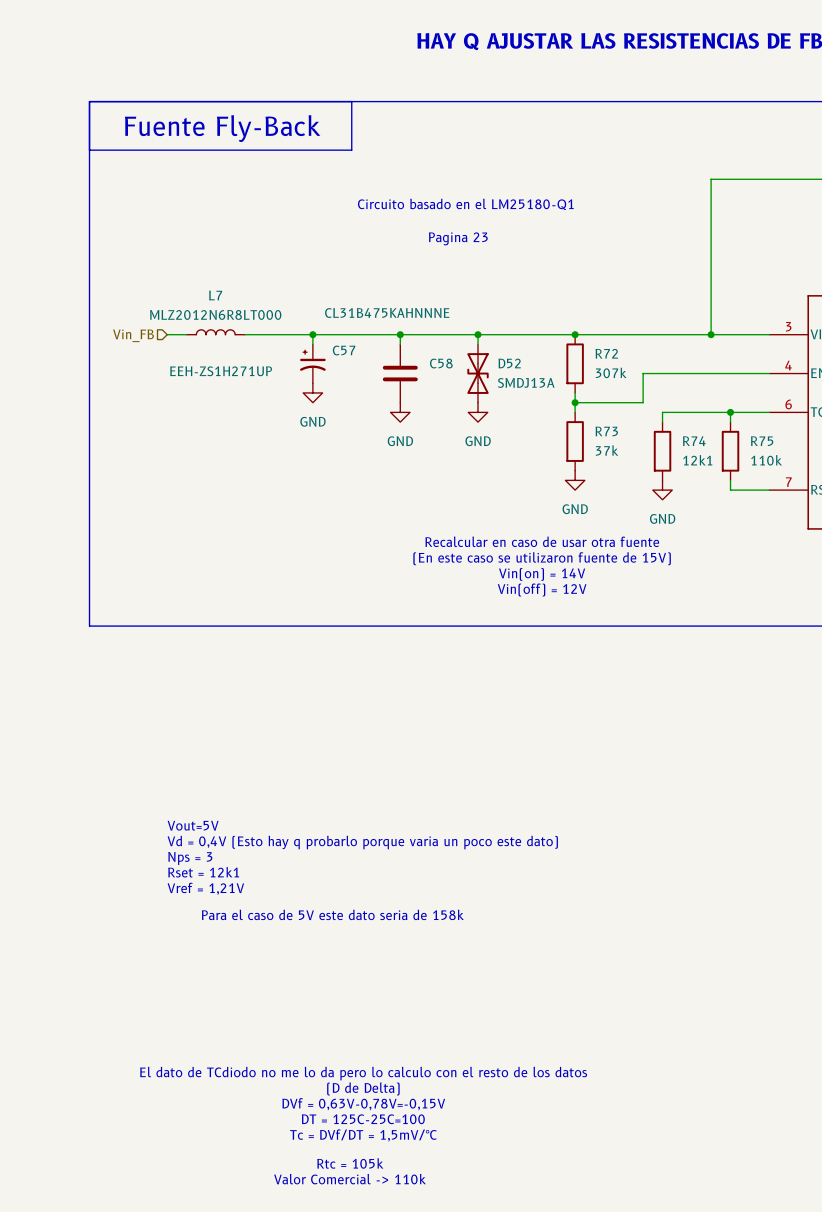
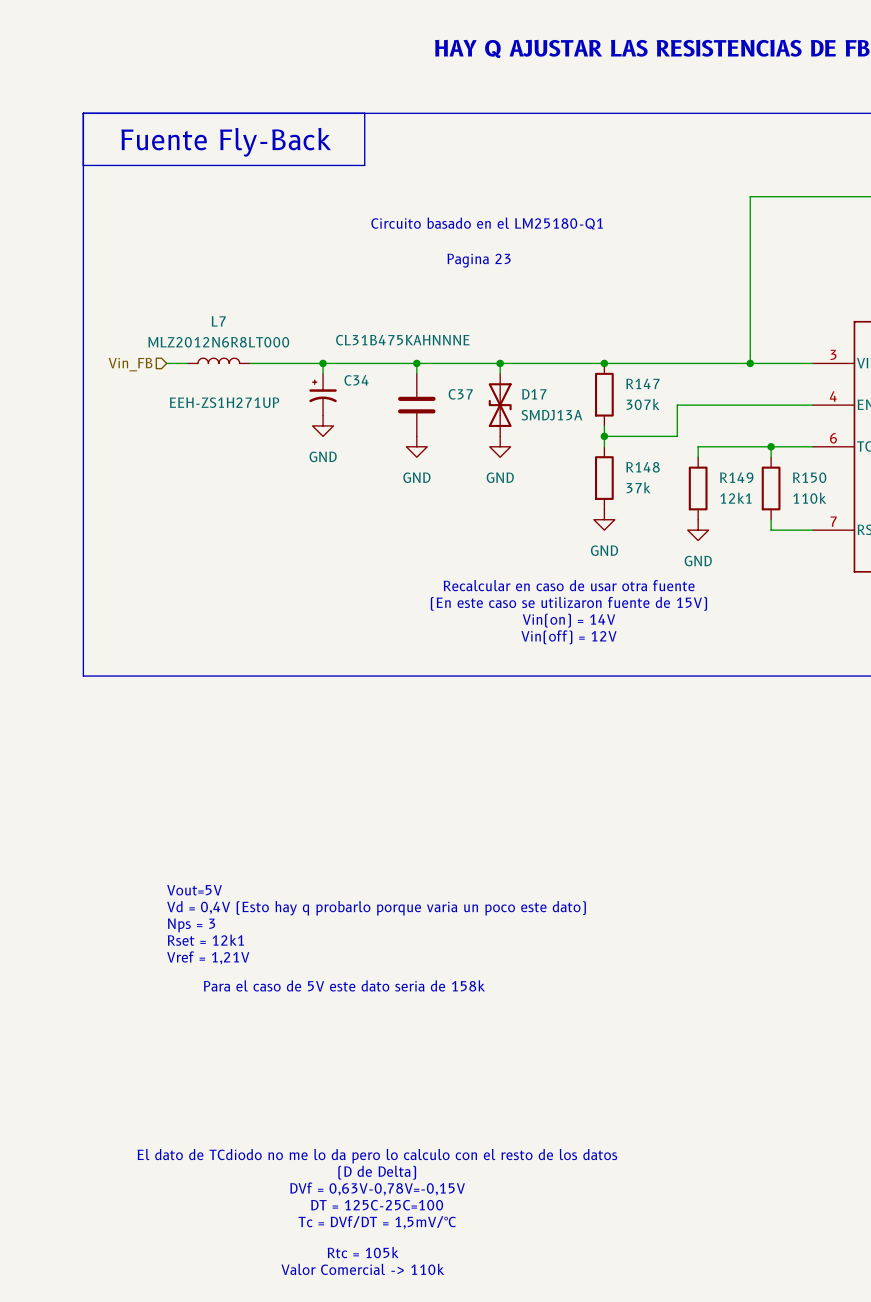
C57 name: C57 (344, 350) -> C34 (356, 380)
R72 name: R72 (606, 353) -> R147 (642, 383)
C58 name: C58 (441, 363) -> C37 (460, 394)
D52 name: D52 (509, 363) -> D17 (534, 394)
R73 name: R73 (606, 431) -> R148 (643, 467)
R74 name: R74 (694, 441) -> R149 (736, 477)
R75 name: R75 (762, 441) -> R150 (809, 477)

